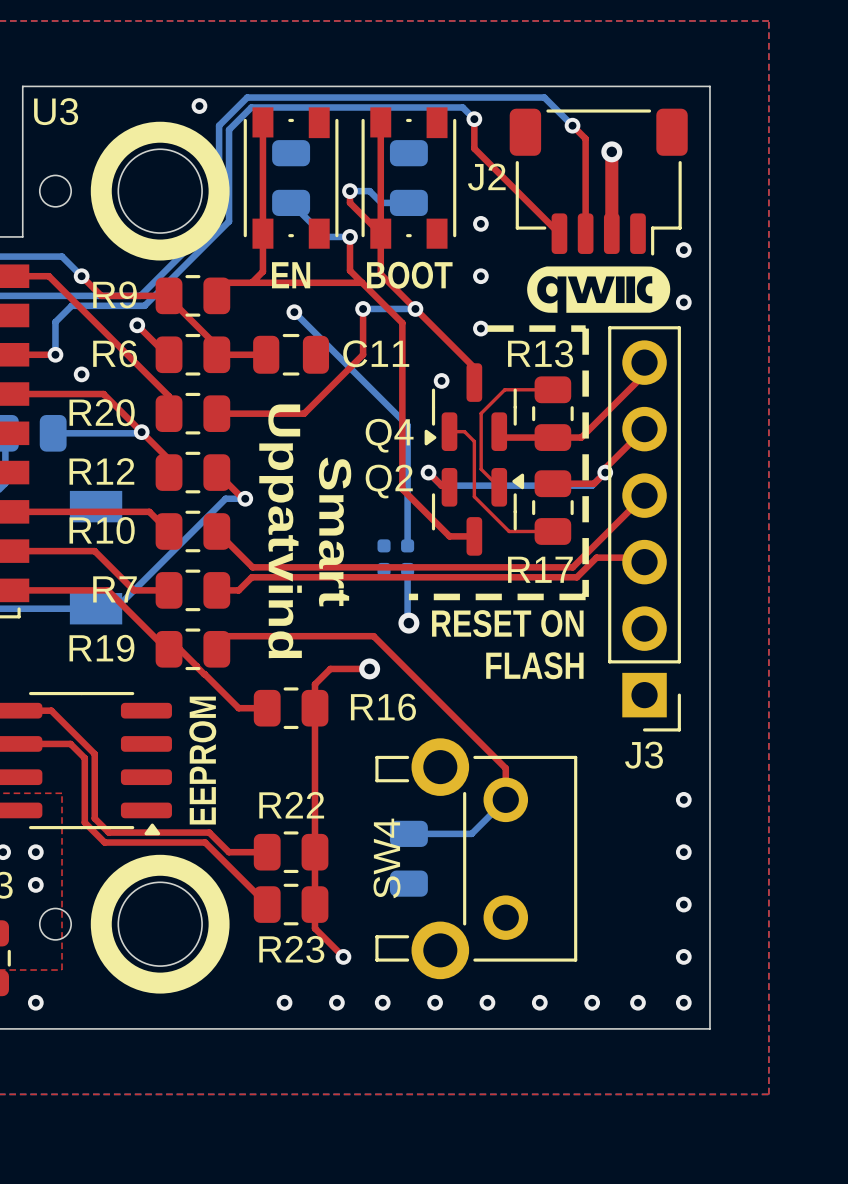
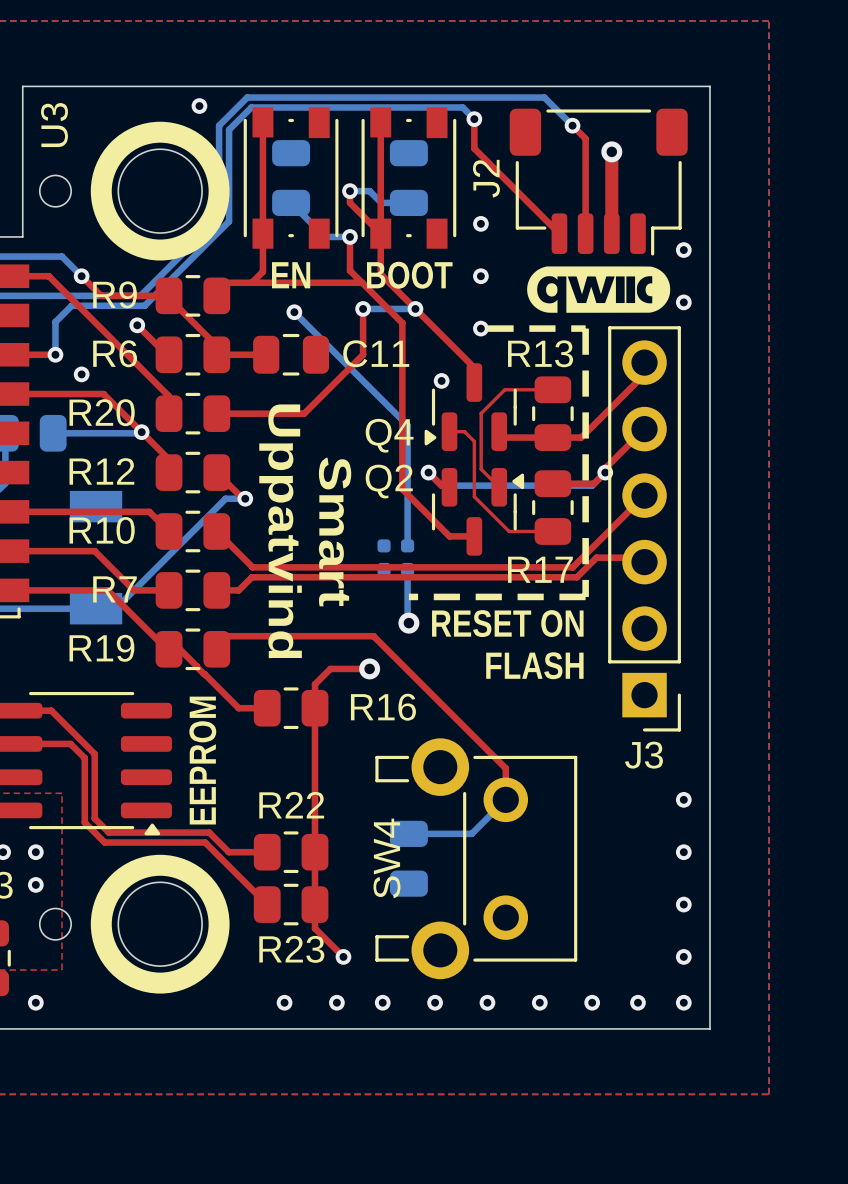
U3 name rotation: 0° (56, 111) -> 90° counterclockwise (54, 125)
J2 name rotation: 0° (486, 177) -> 90° counterclockwise (486, 178)

